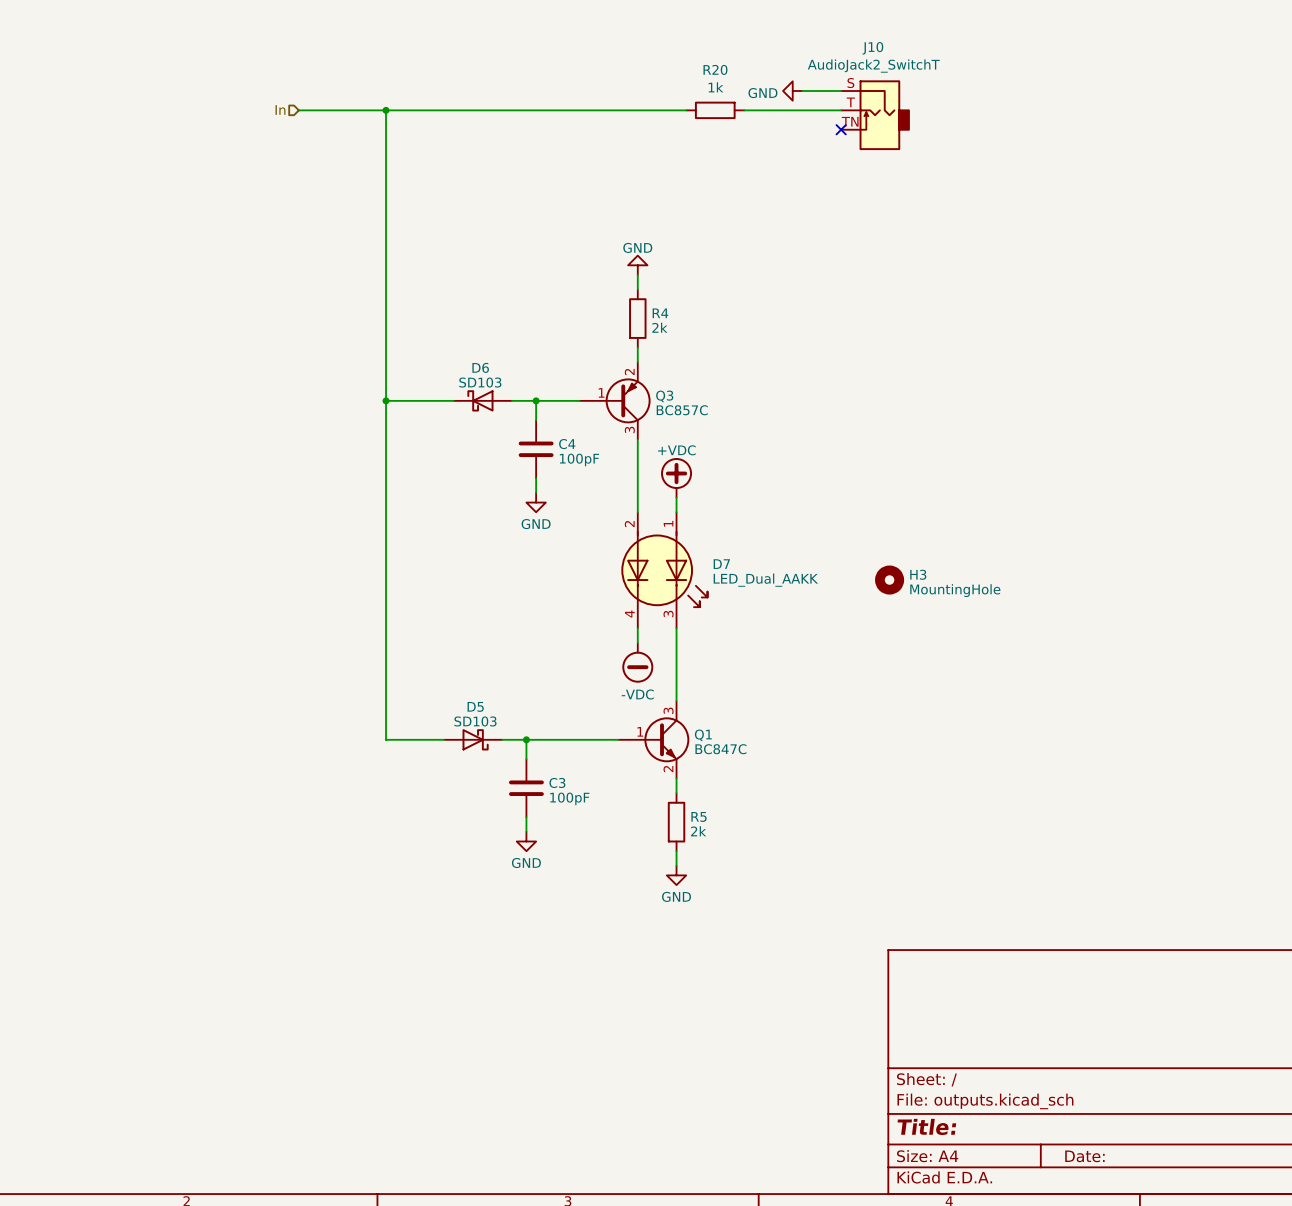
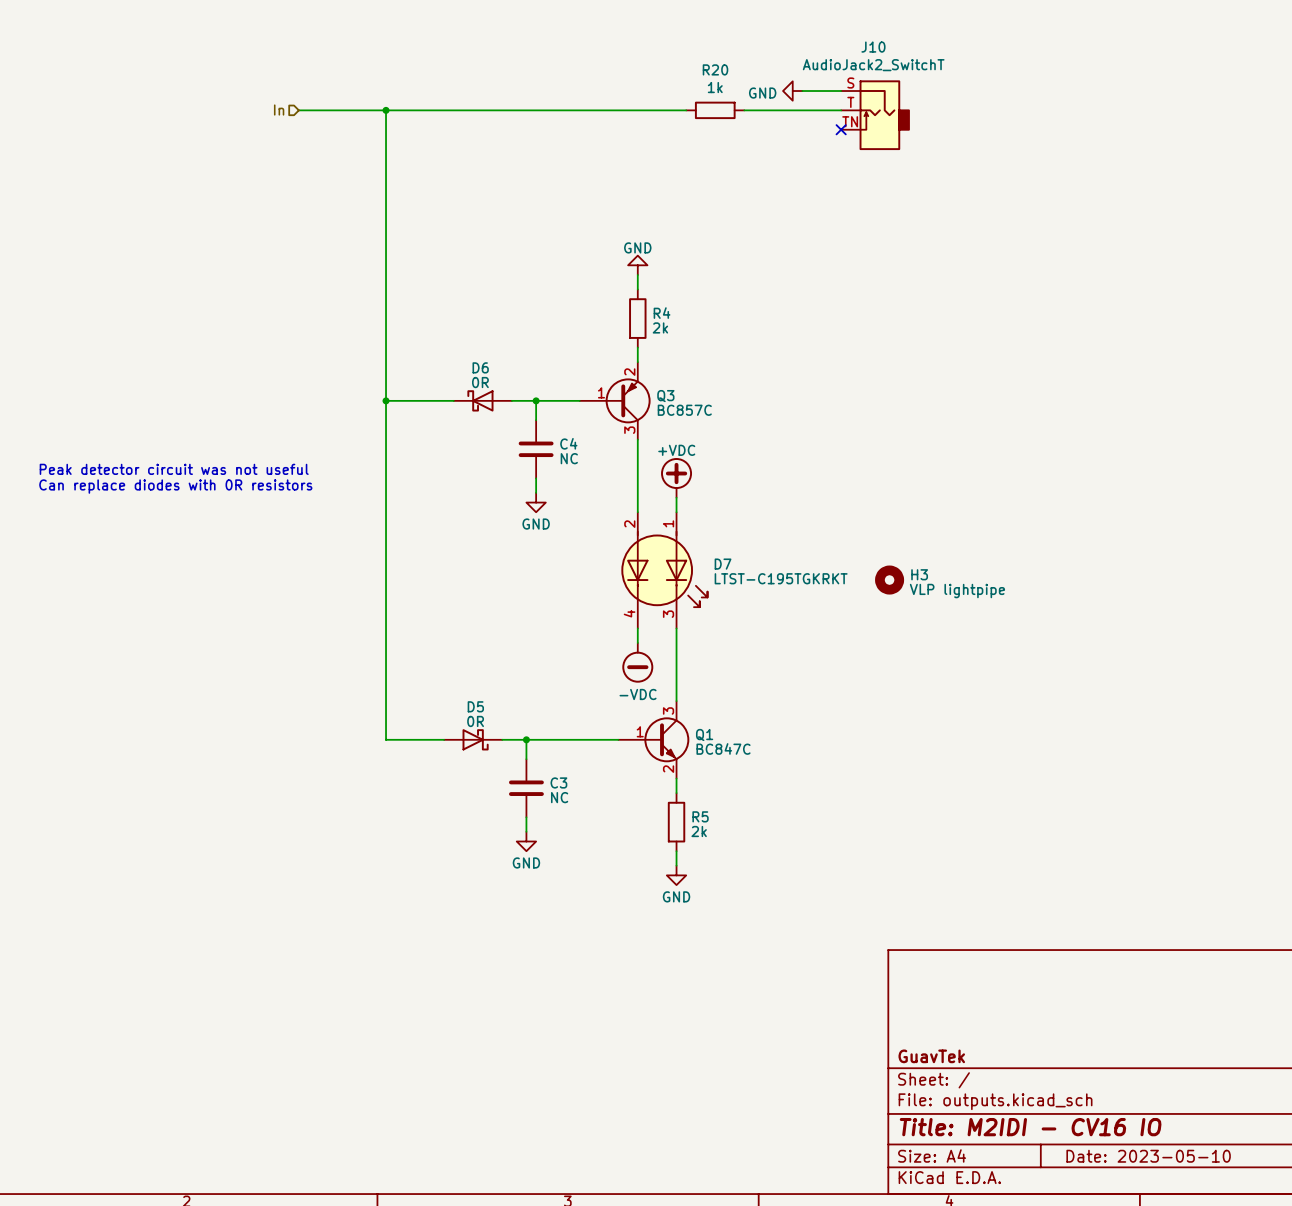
D6 value: SD103 (480, 382) -> 0R (480, 382)
C4 value: 100pF (579, 459) -> NC (569, 458)
text: none -> Peak detector circuit was not useful (174, 469)
text: none -> Can replace diodes with 0R resistors (175, 486)
D7 value: LED_Dual_AAKK (765, 580) -> LTST-C195TGKRKT (781, 578)
H3 value: MountingHole (955, 590) -> VLP lightpipe (957, 591)
D5 value: SD103 (475, 721) -> 0R (475, 721)
C3 value: 100pF (569, 798) -> NC (559, 797)
title block: none -> GuavTek (931, 1056)
title block: Title: (926, 1126) -> Title: M2IDI - CV16 IO (1030, 1127)
title block: Date: (1084, 1156) -> Date: 2023-05-10 (1148, 1156)

